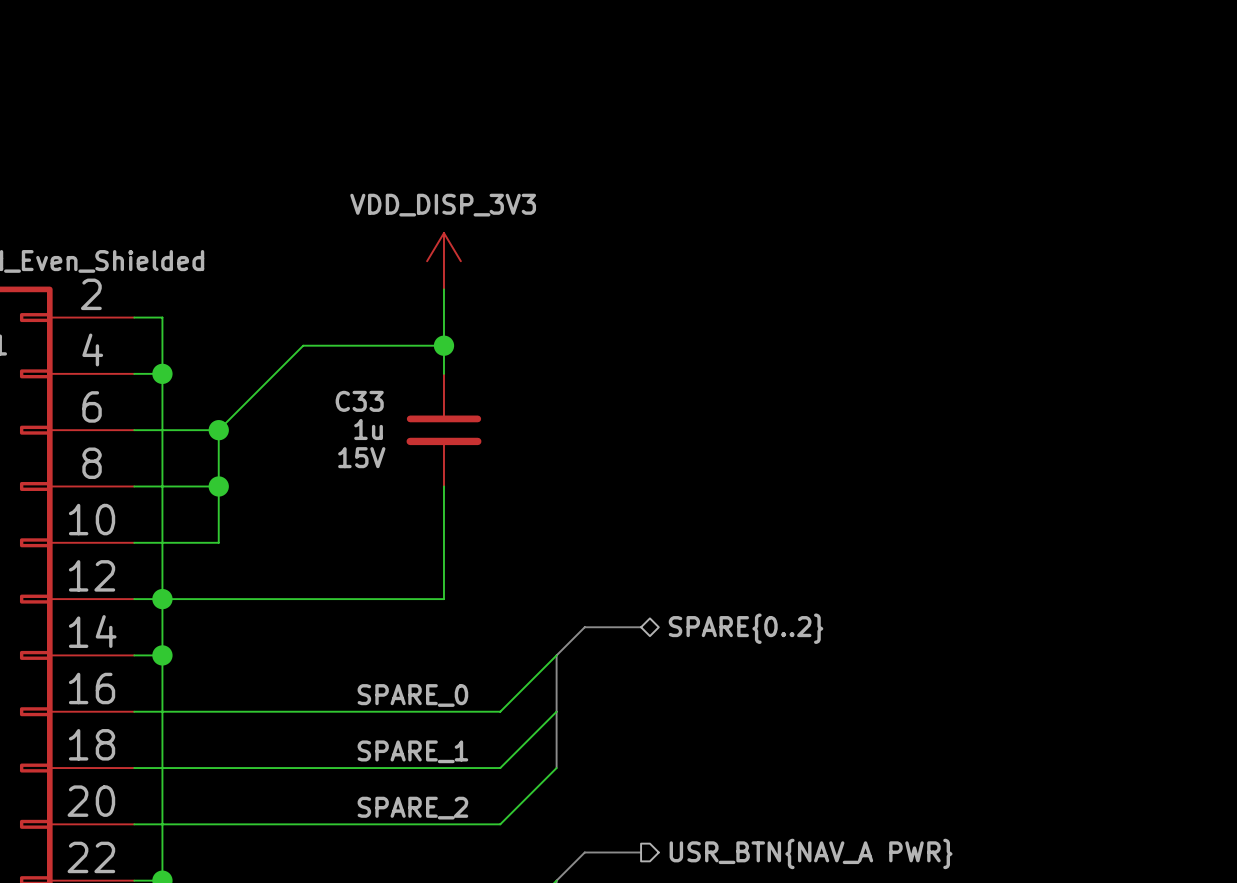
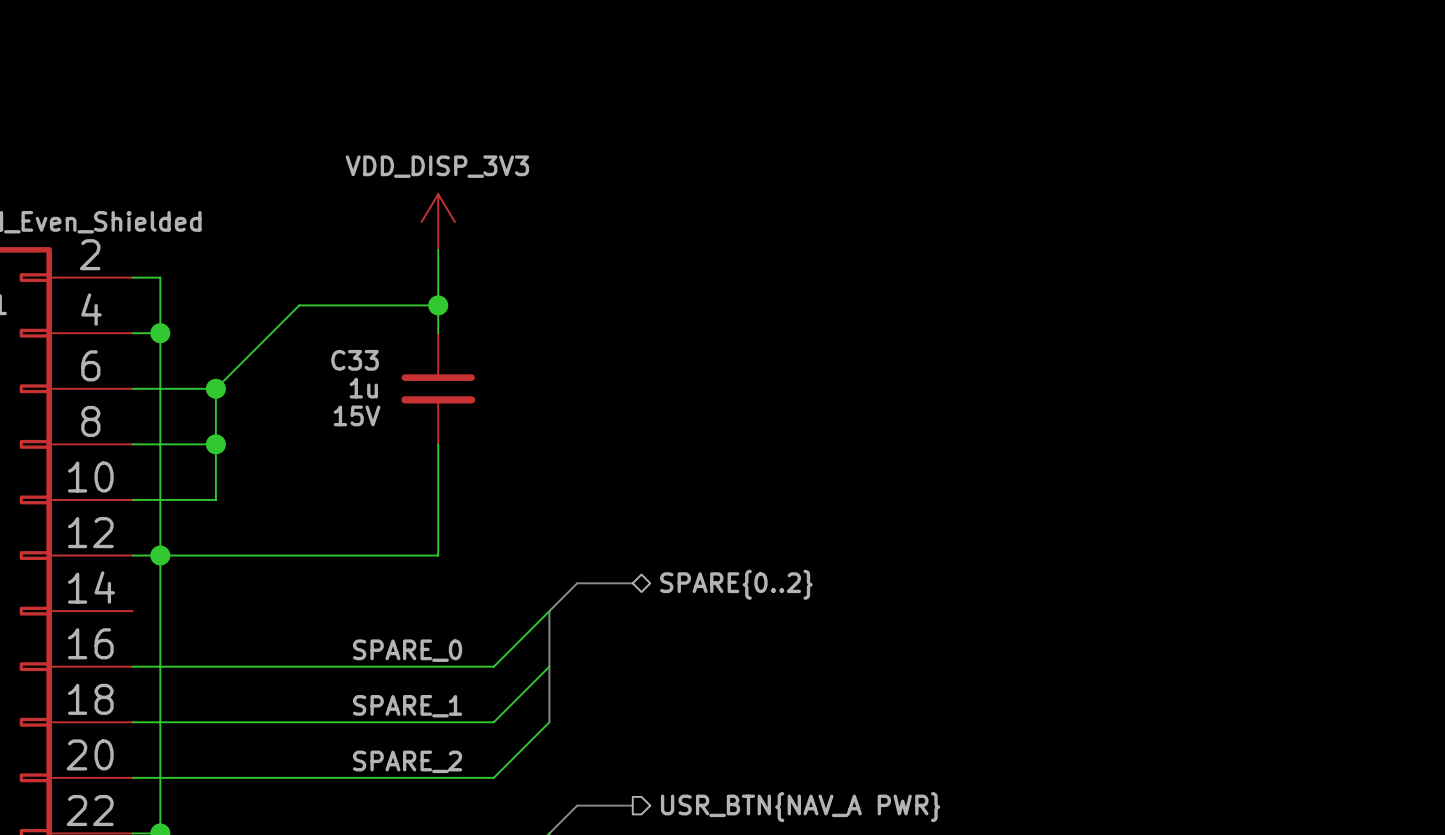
wire: (134, 655) (162, 655) -> none
junction: (162, 655) -> none

